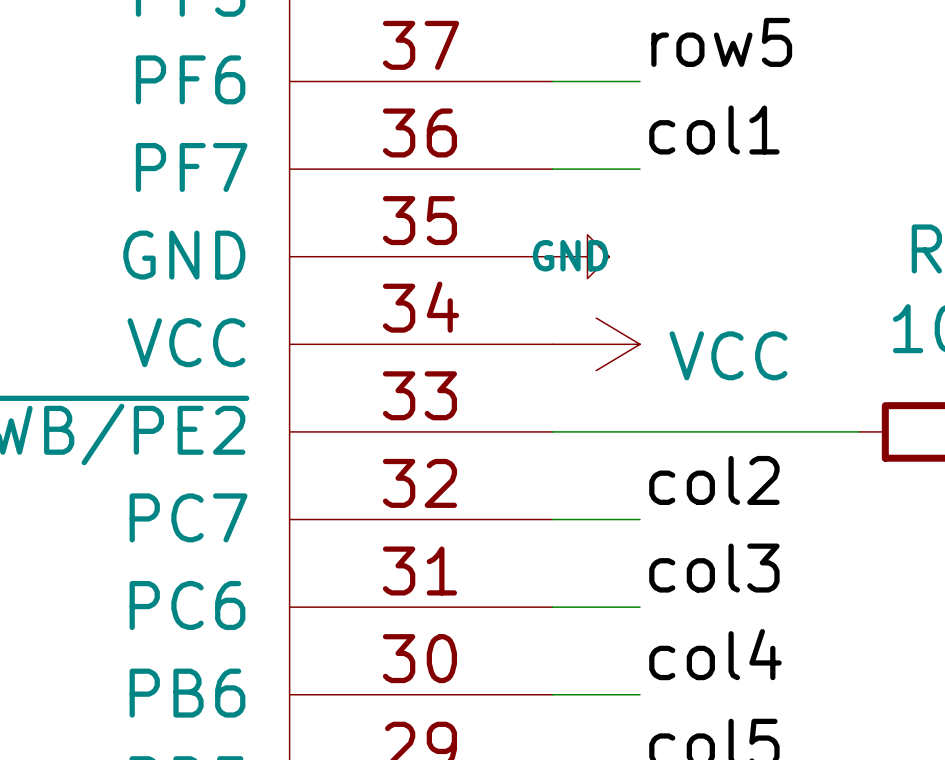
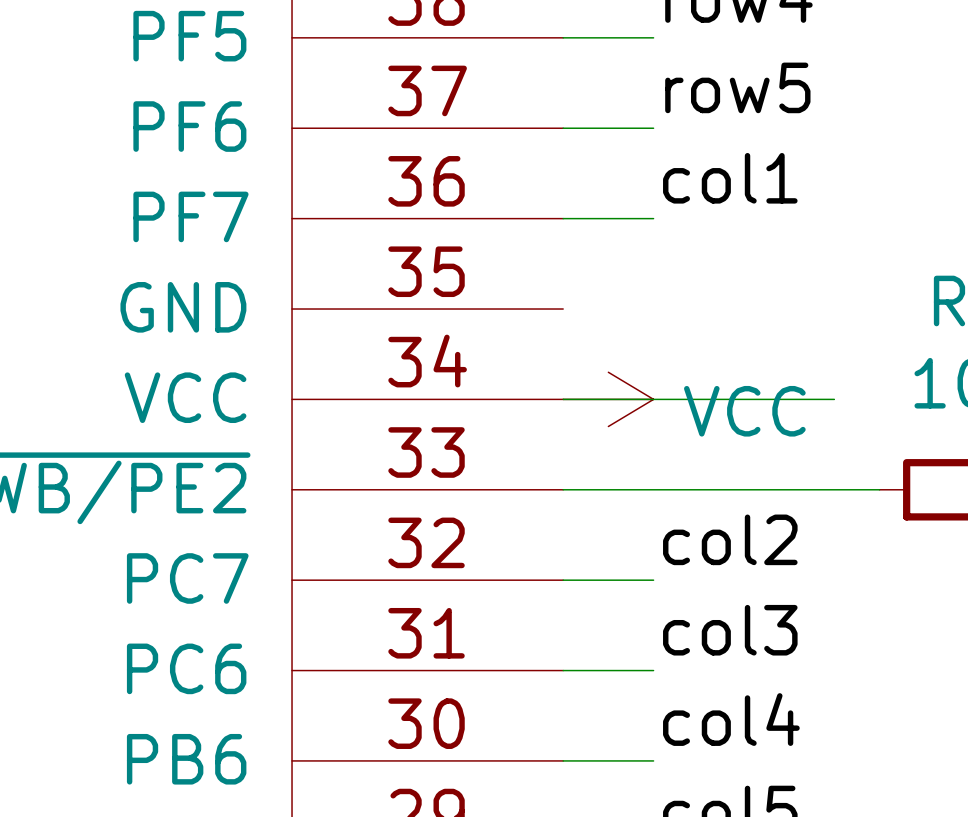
power symbol: GND (580, 256) -> none
wire: none -> (563, 399) (834, 399)

